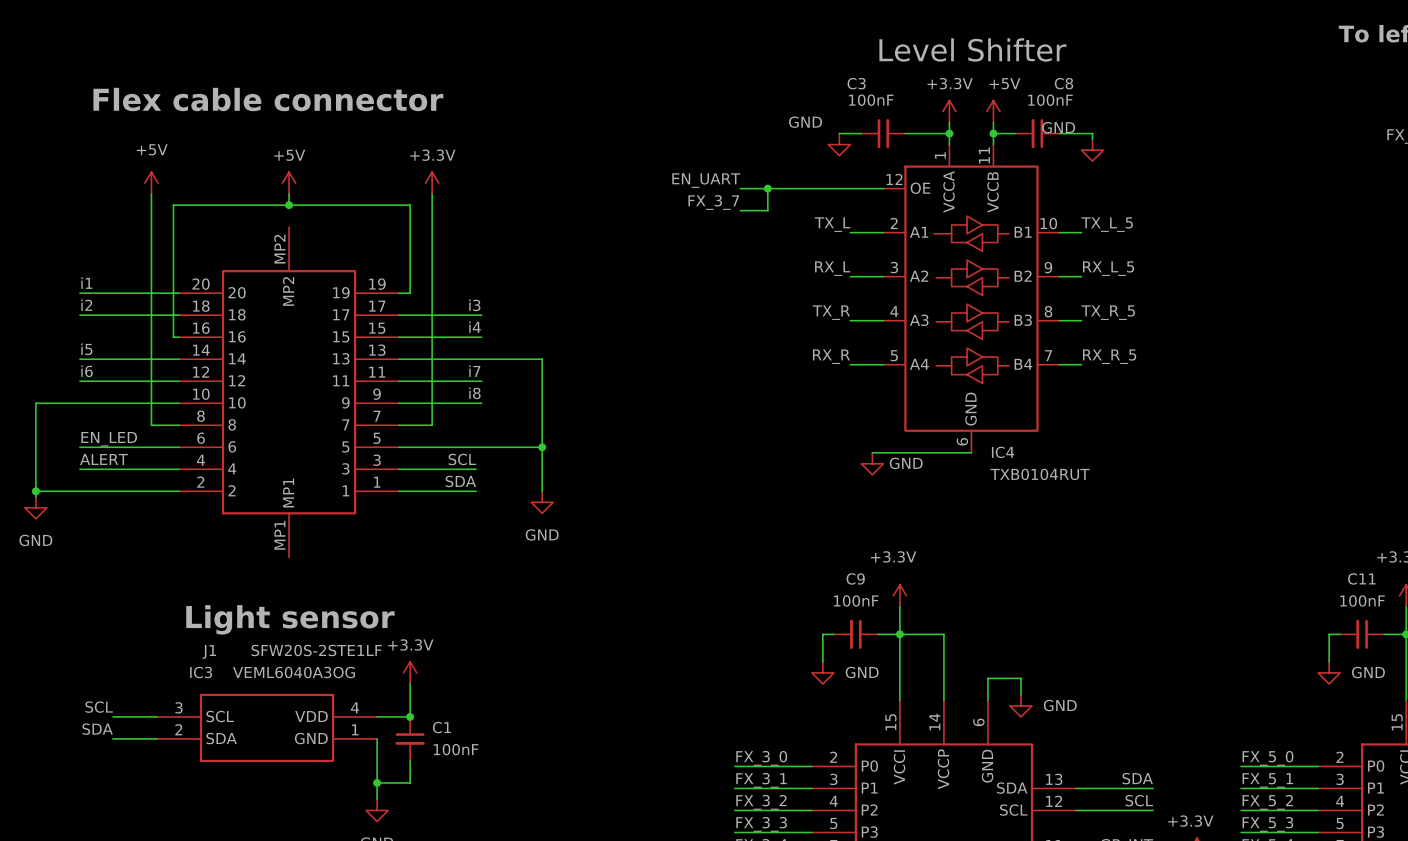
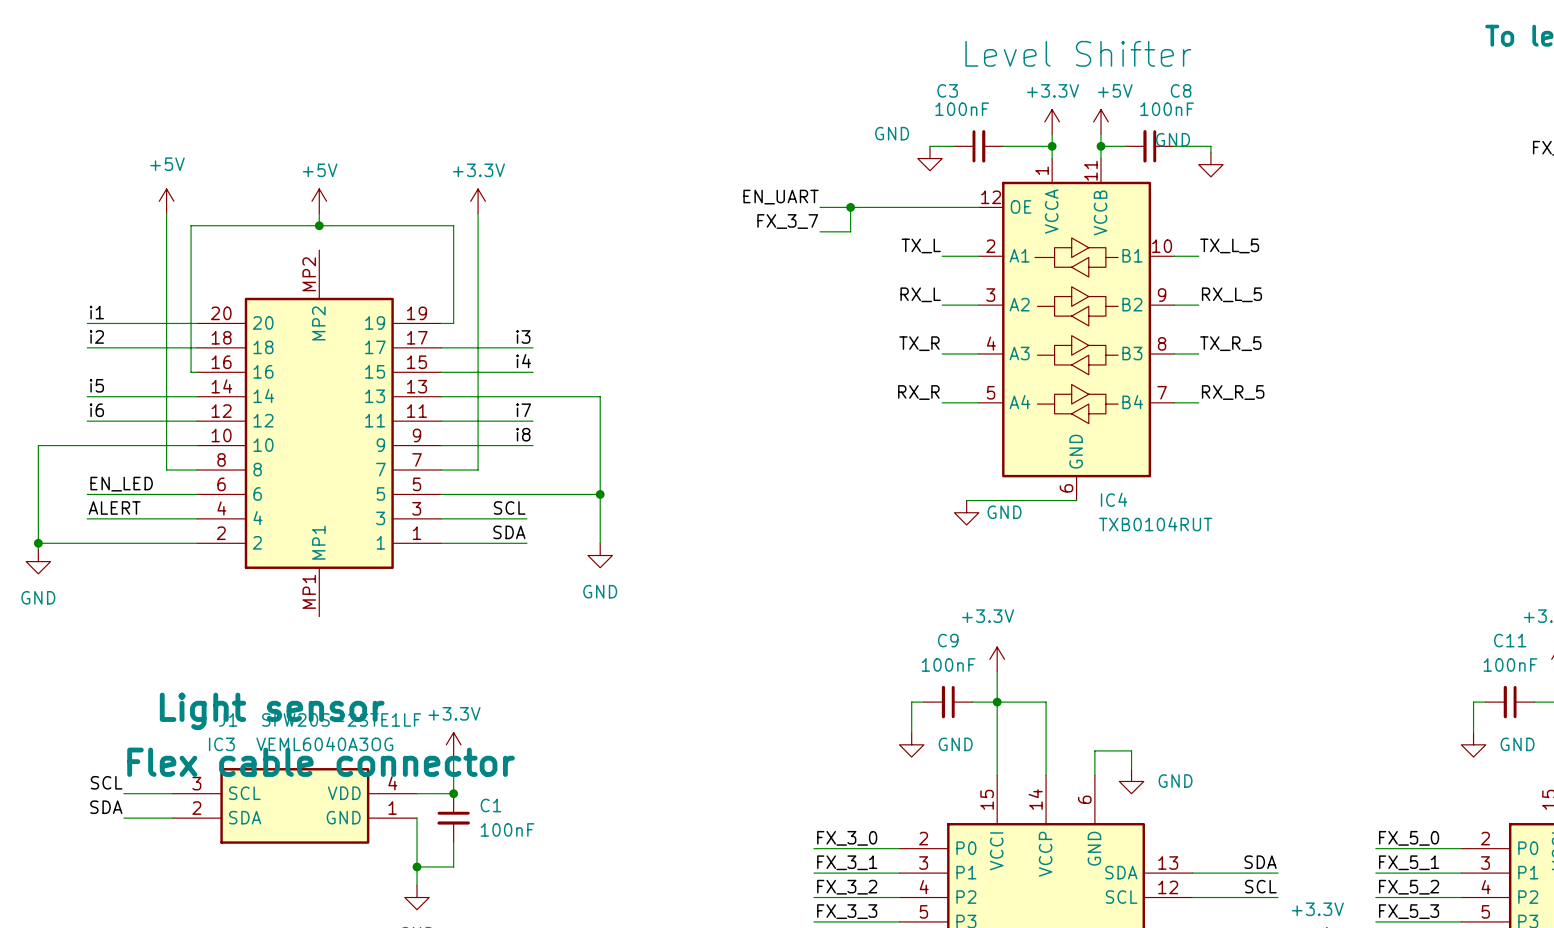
J1 text position: Flex cable connector (268, 99) -> Flex cable connector (321, 762)
IC3 text position: Light sensor (290, 619) -> Light sensor (272, 711)

